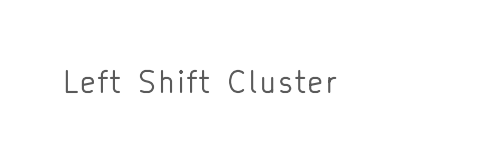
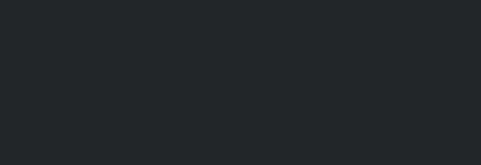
text: Left Shift Cluster (201, 81) -> none

